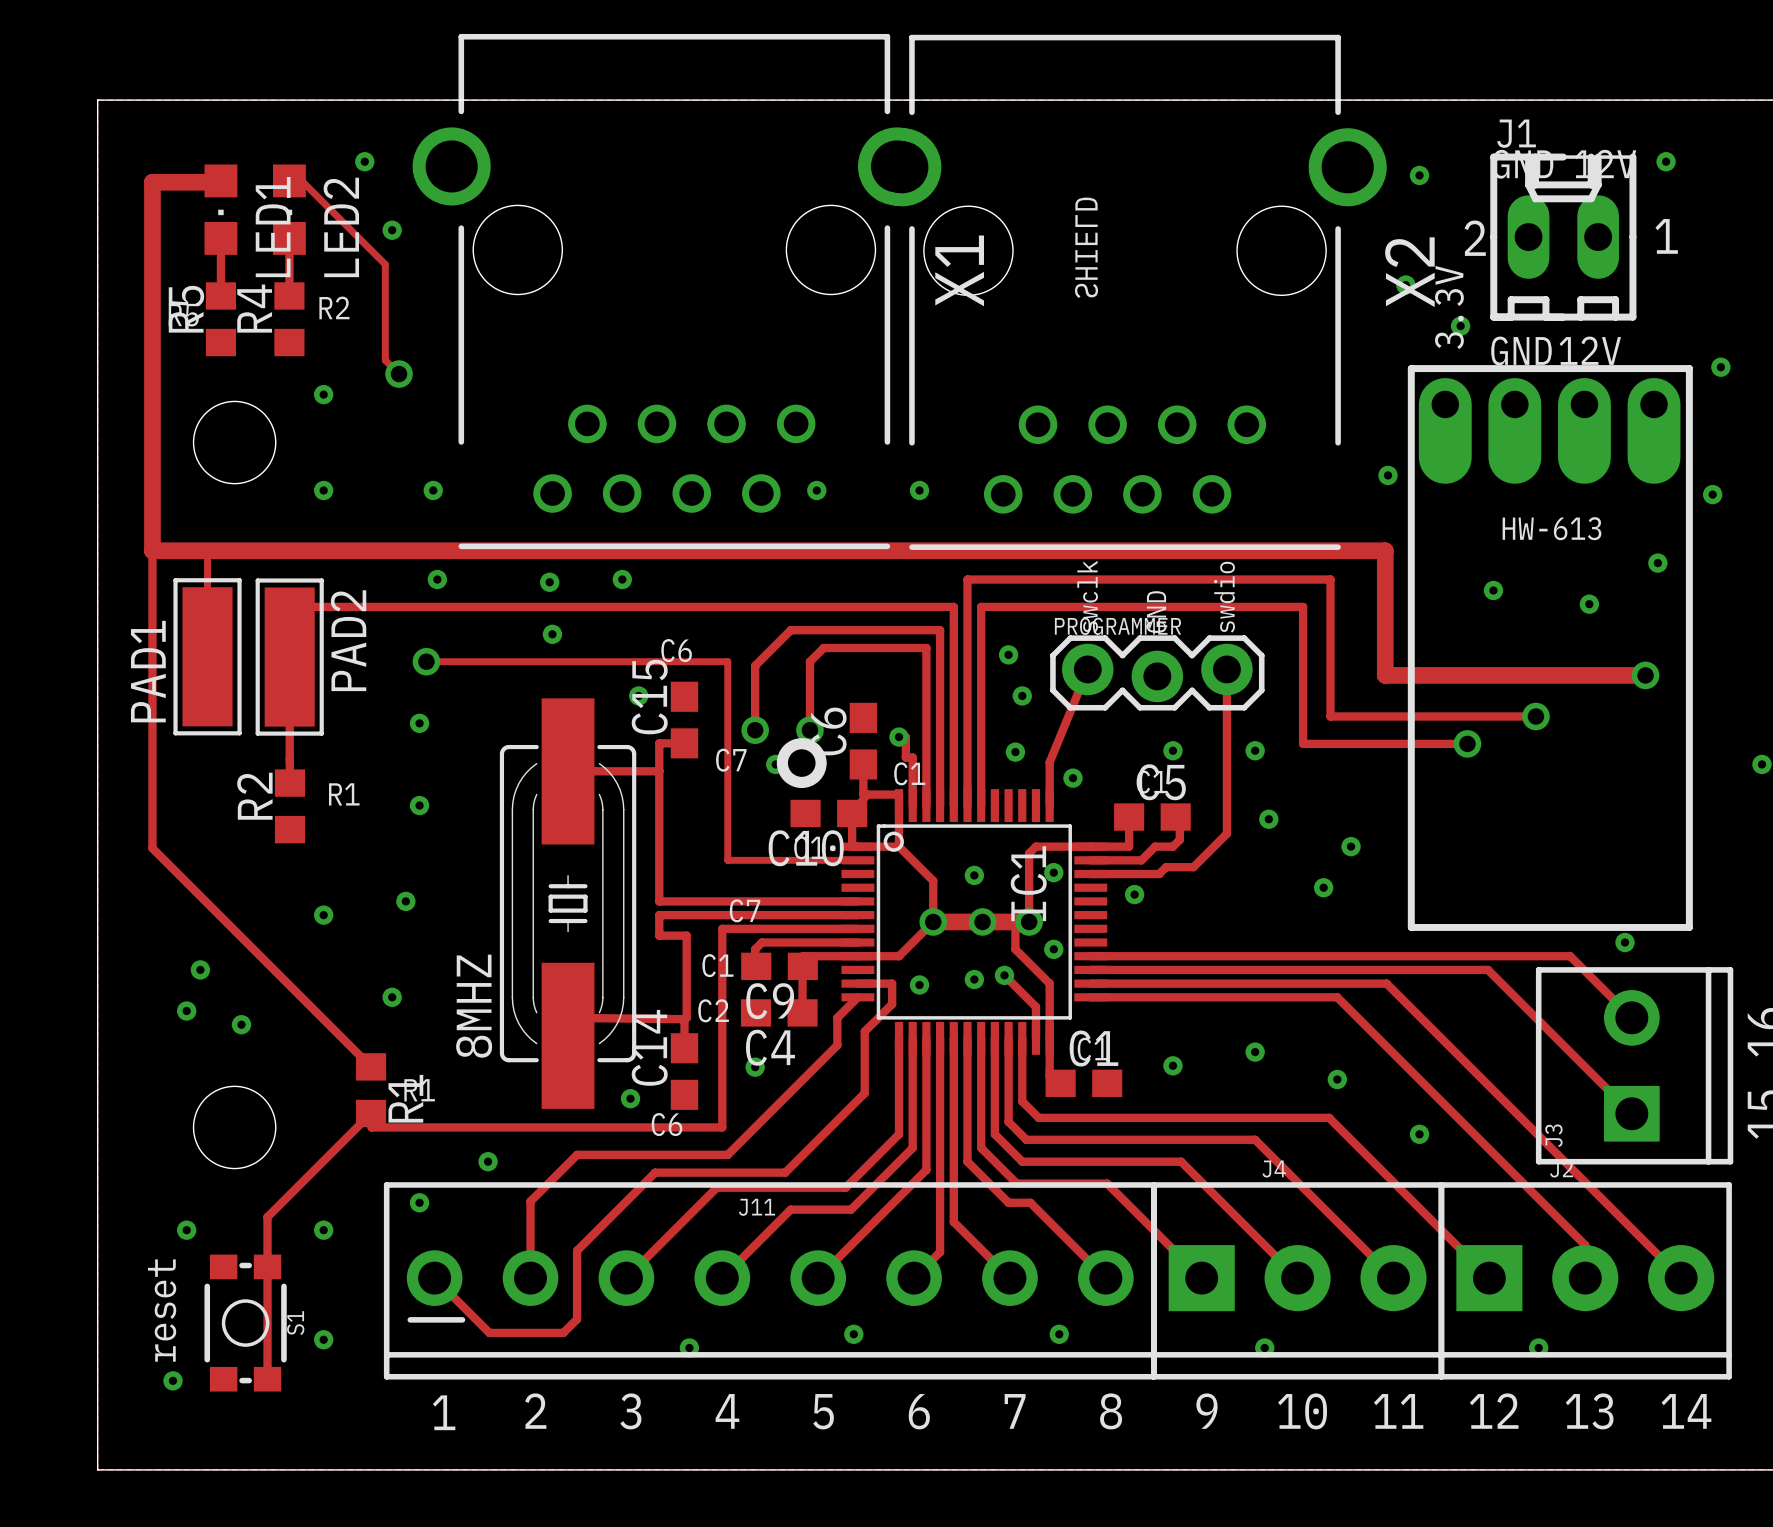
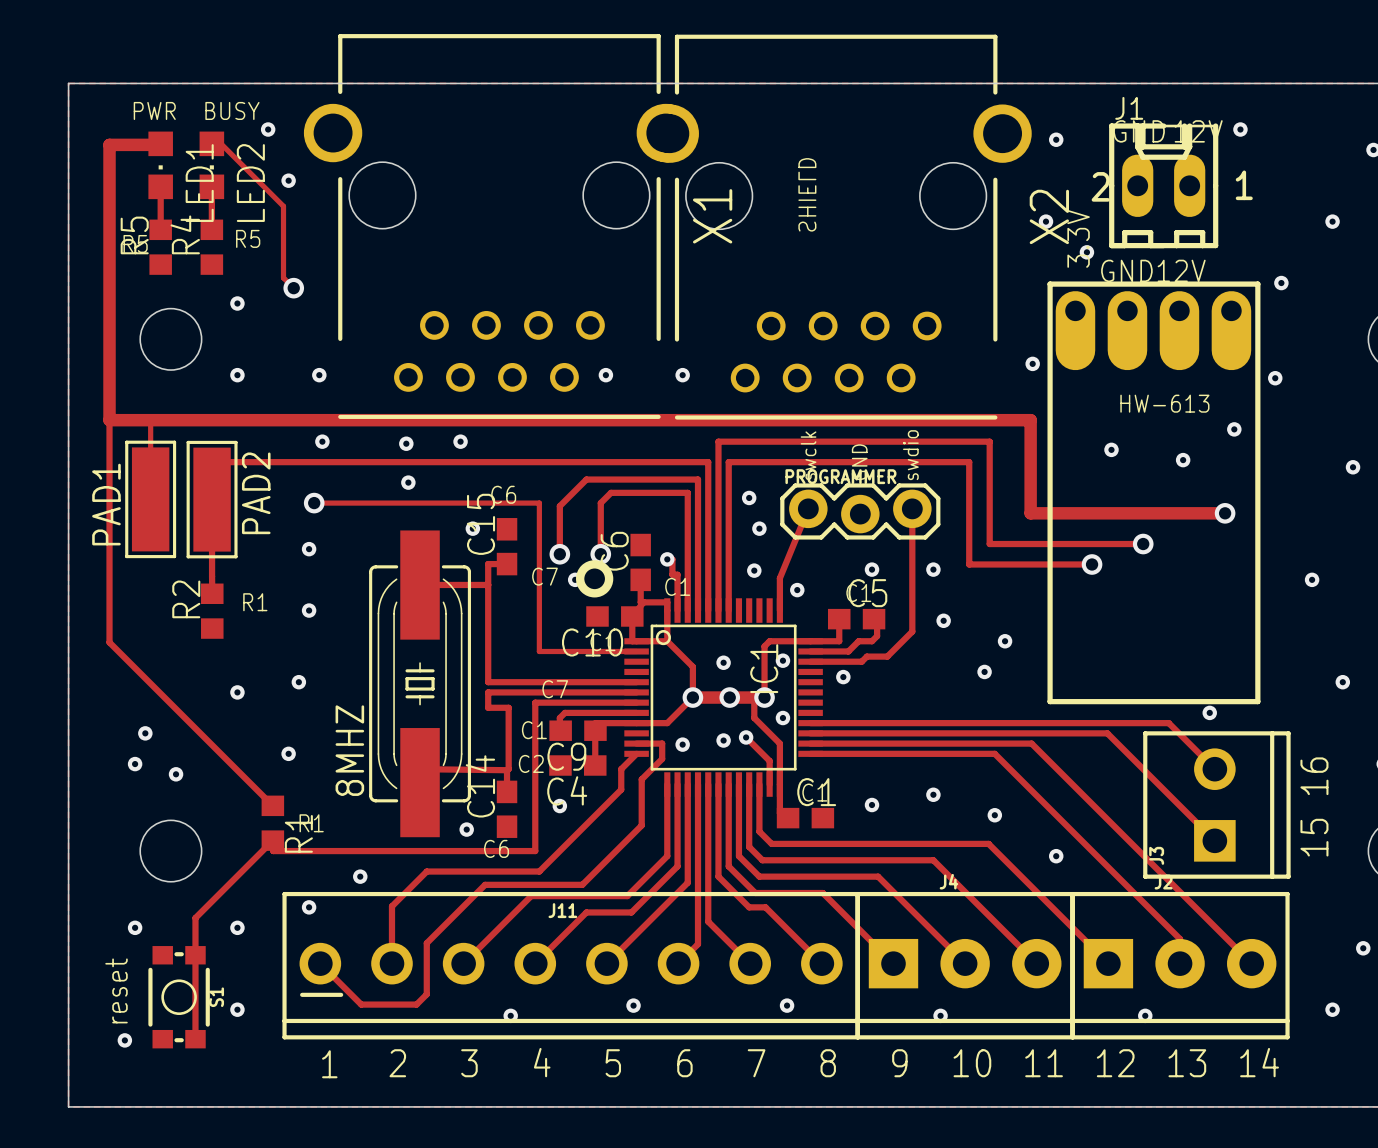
text: none -> PWR (154, 110)
text: none -> BUSY (232, 110)
text: R2 (334, 307) -> R5 (248, 238)

